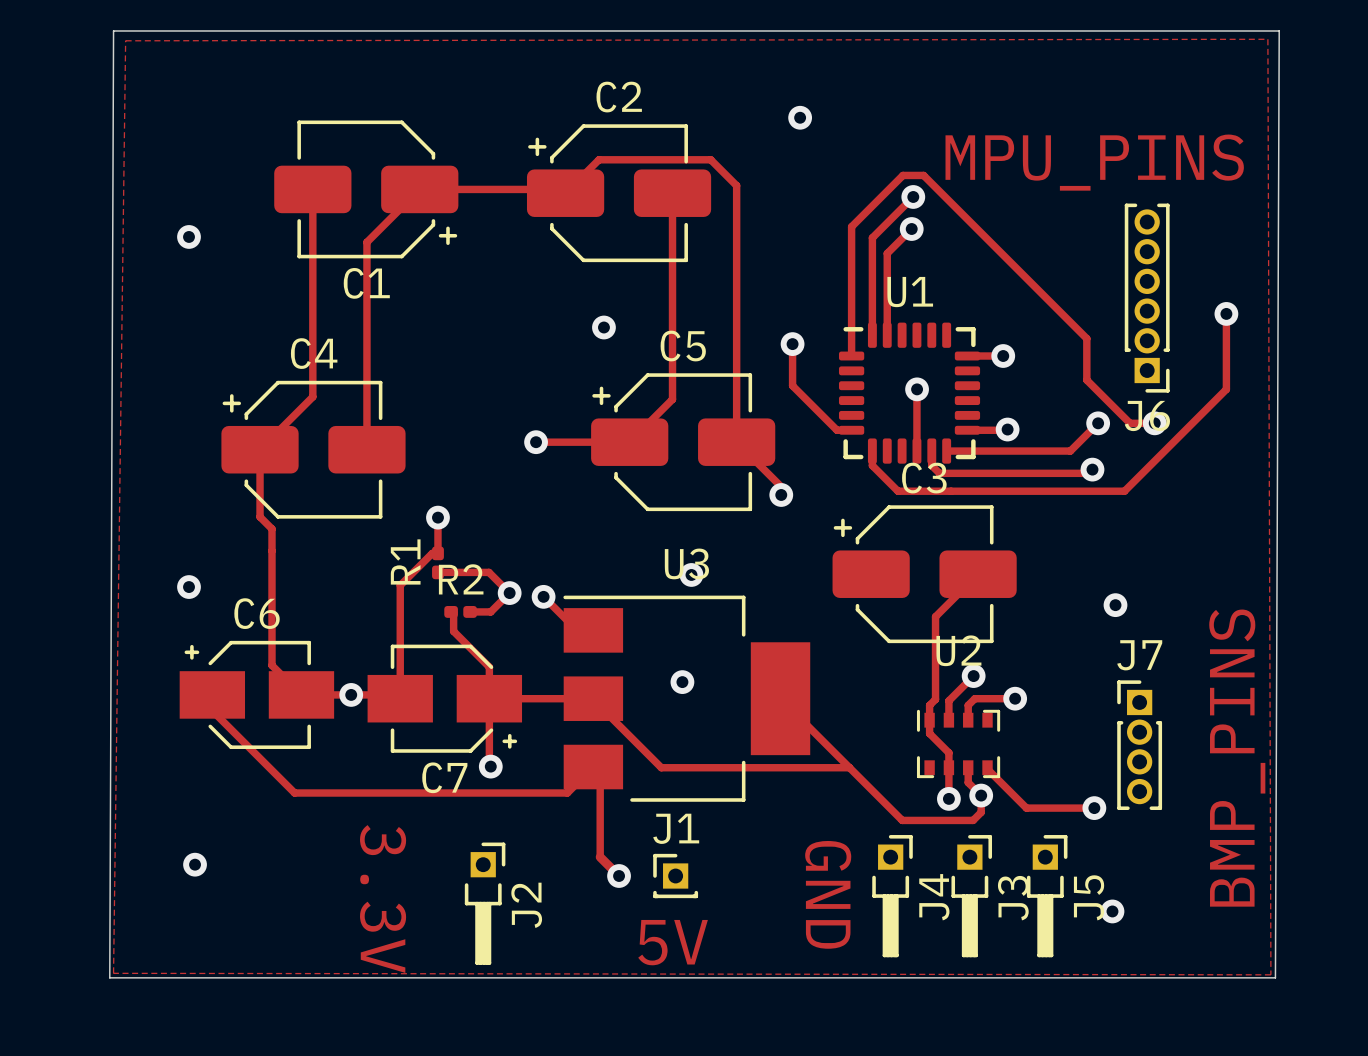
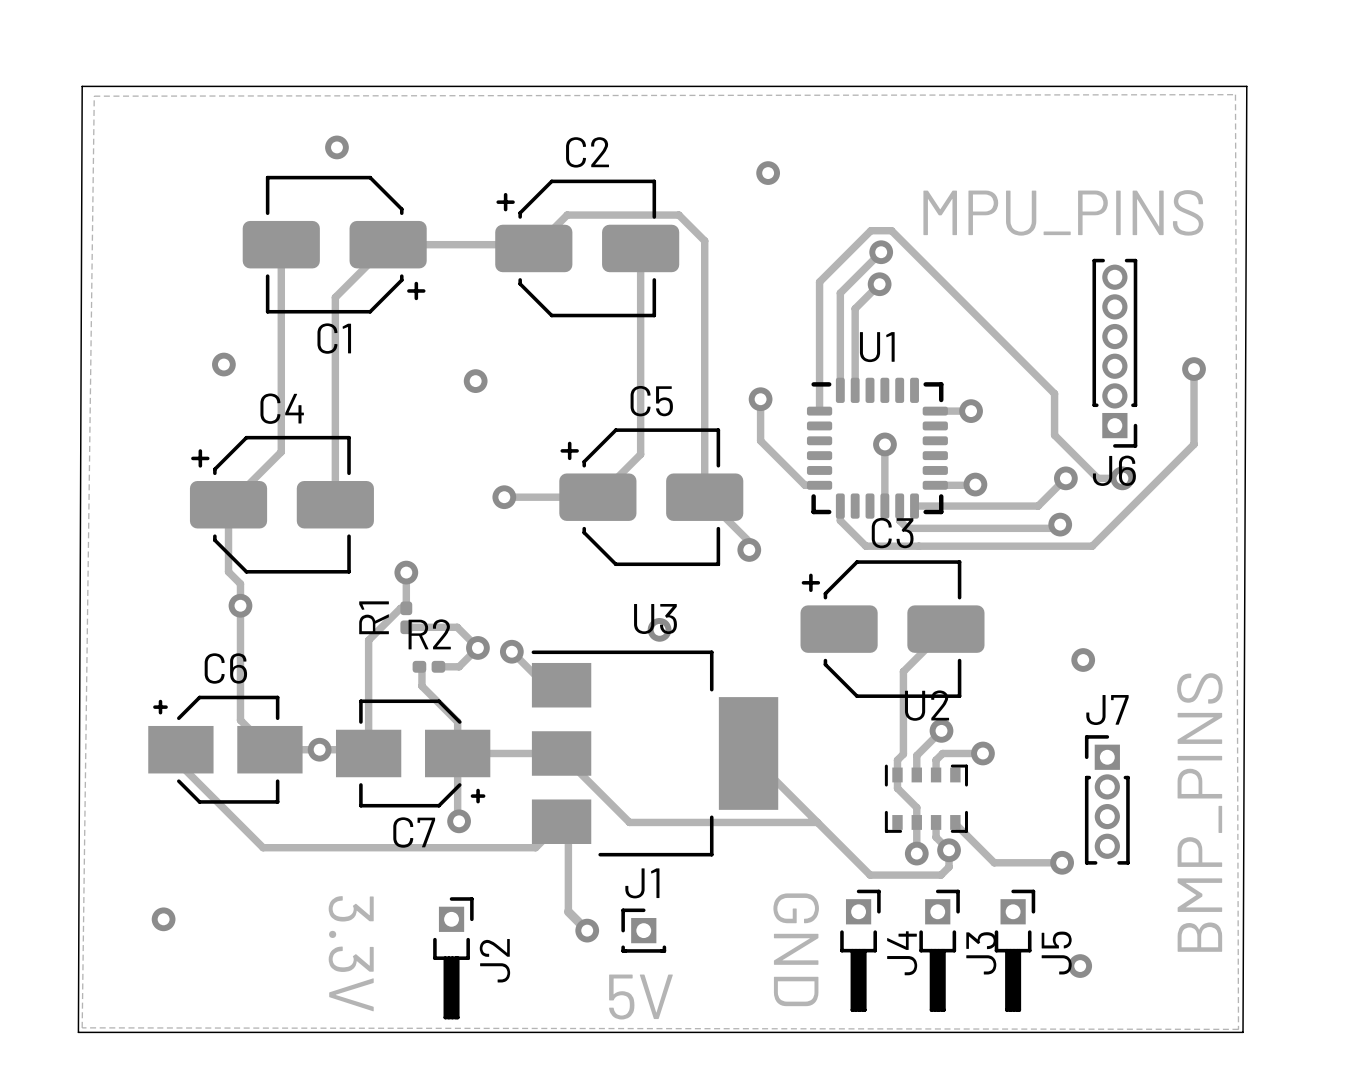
via: none -> (336, 147)
via position: (189, 236) -> (223, 364)
via position: (603, 327) -> (475, 381)
via position: (189, 587) -> (240, 605)
via: (682, 682) -> none

